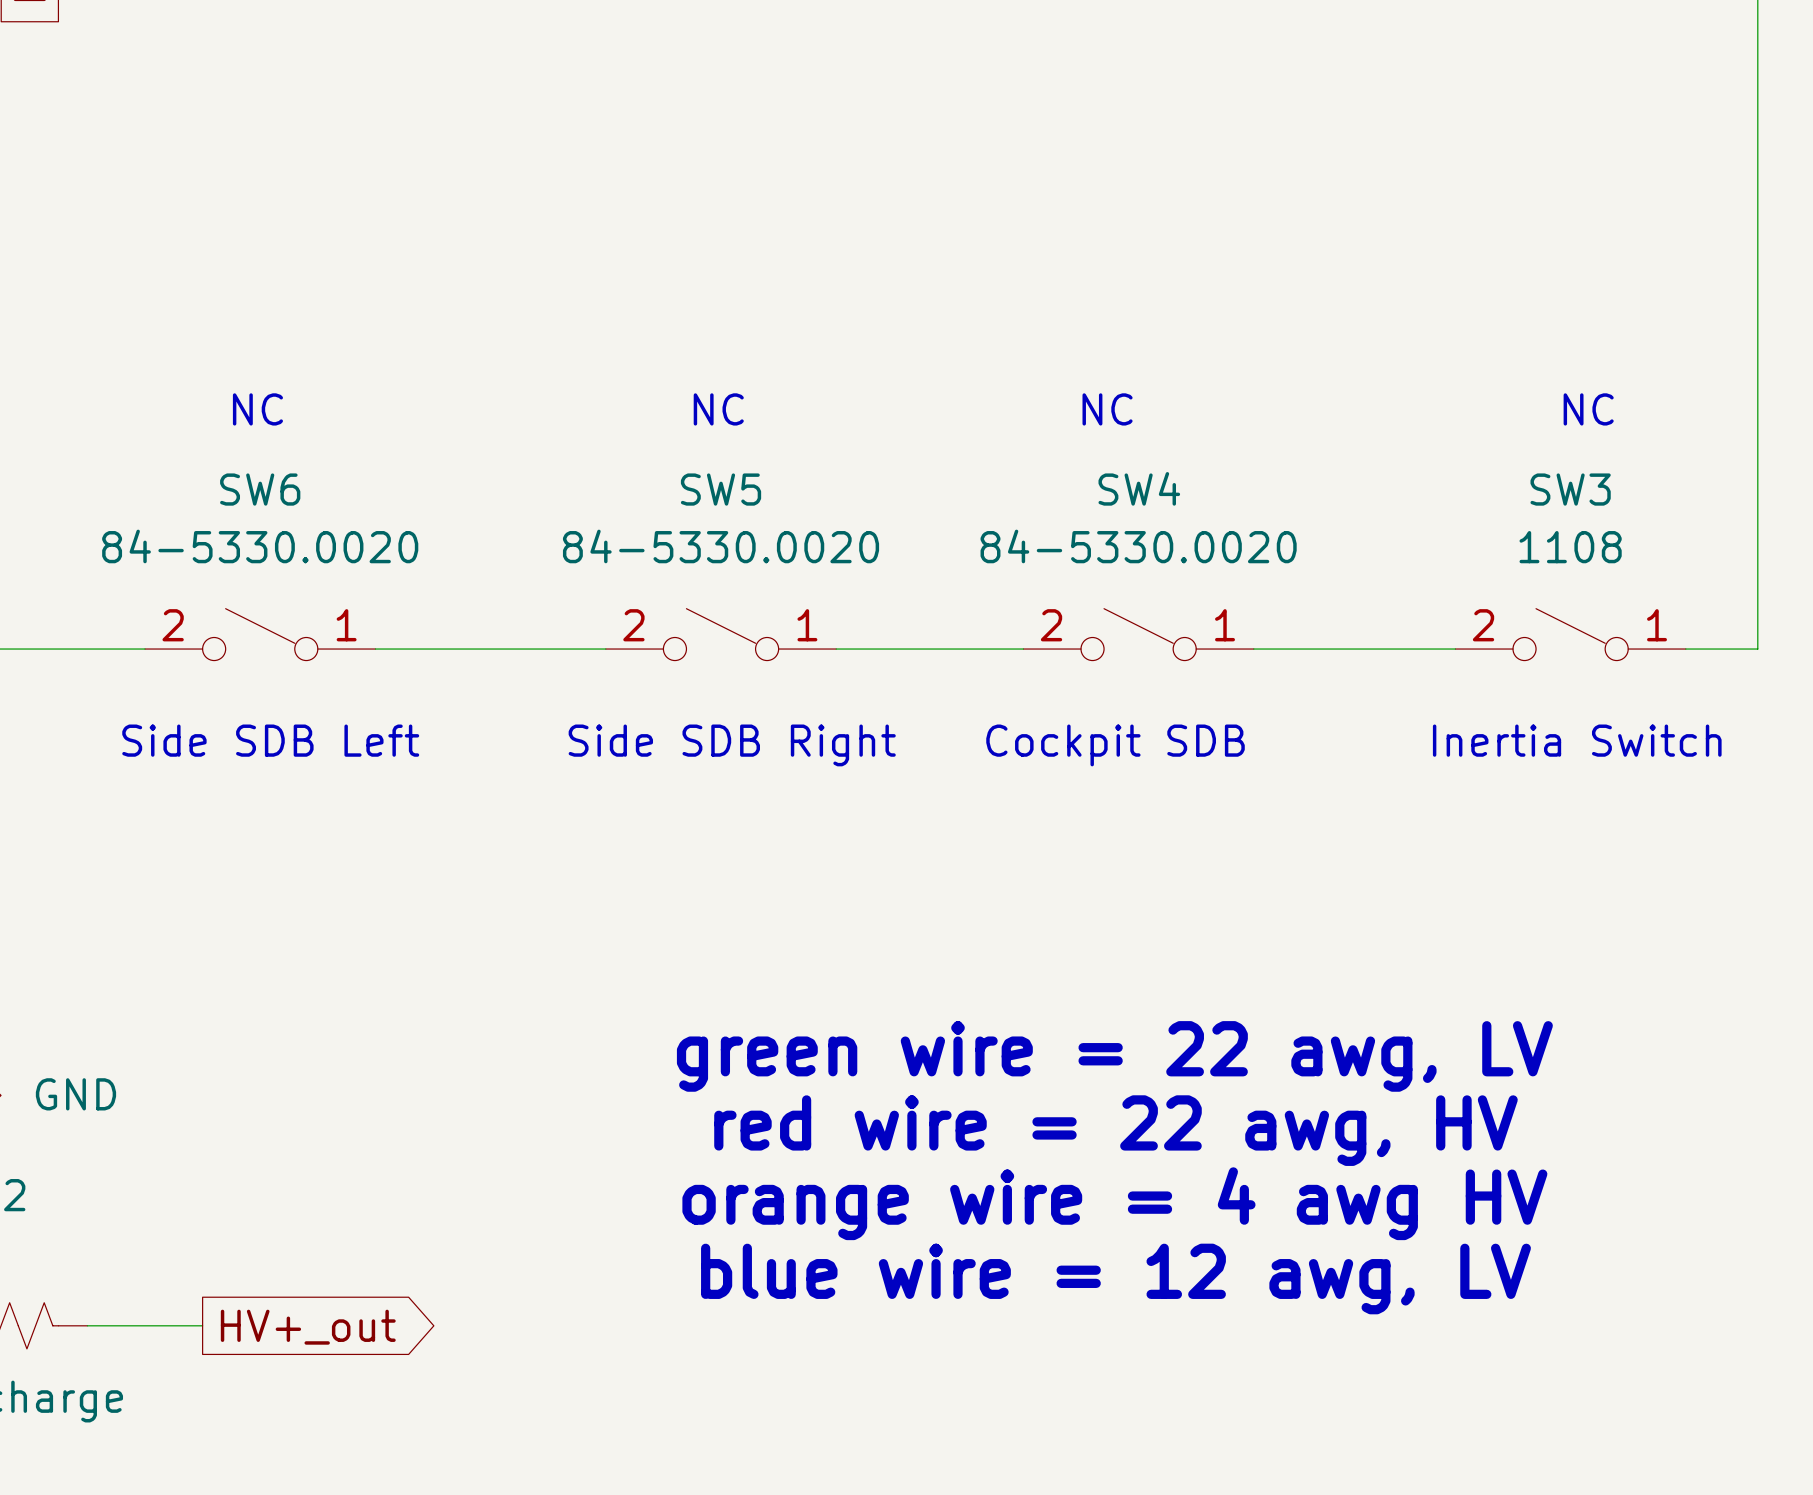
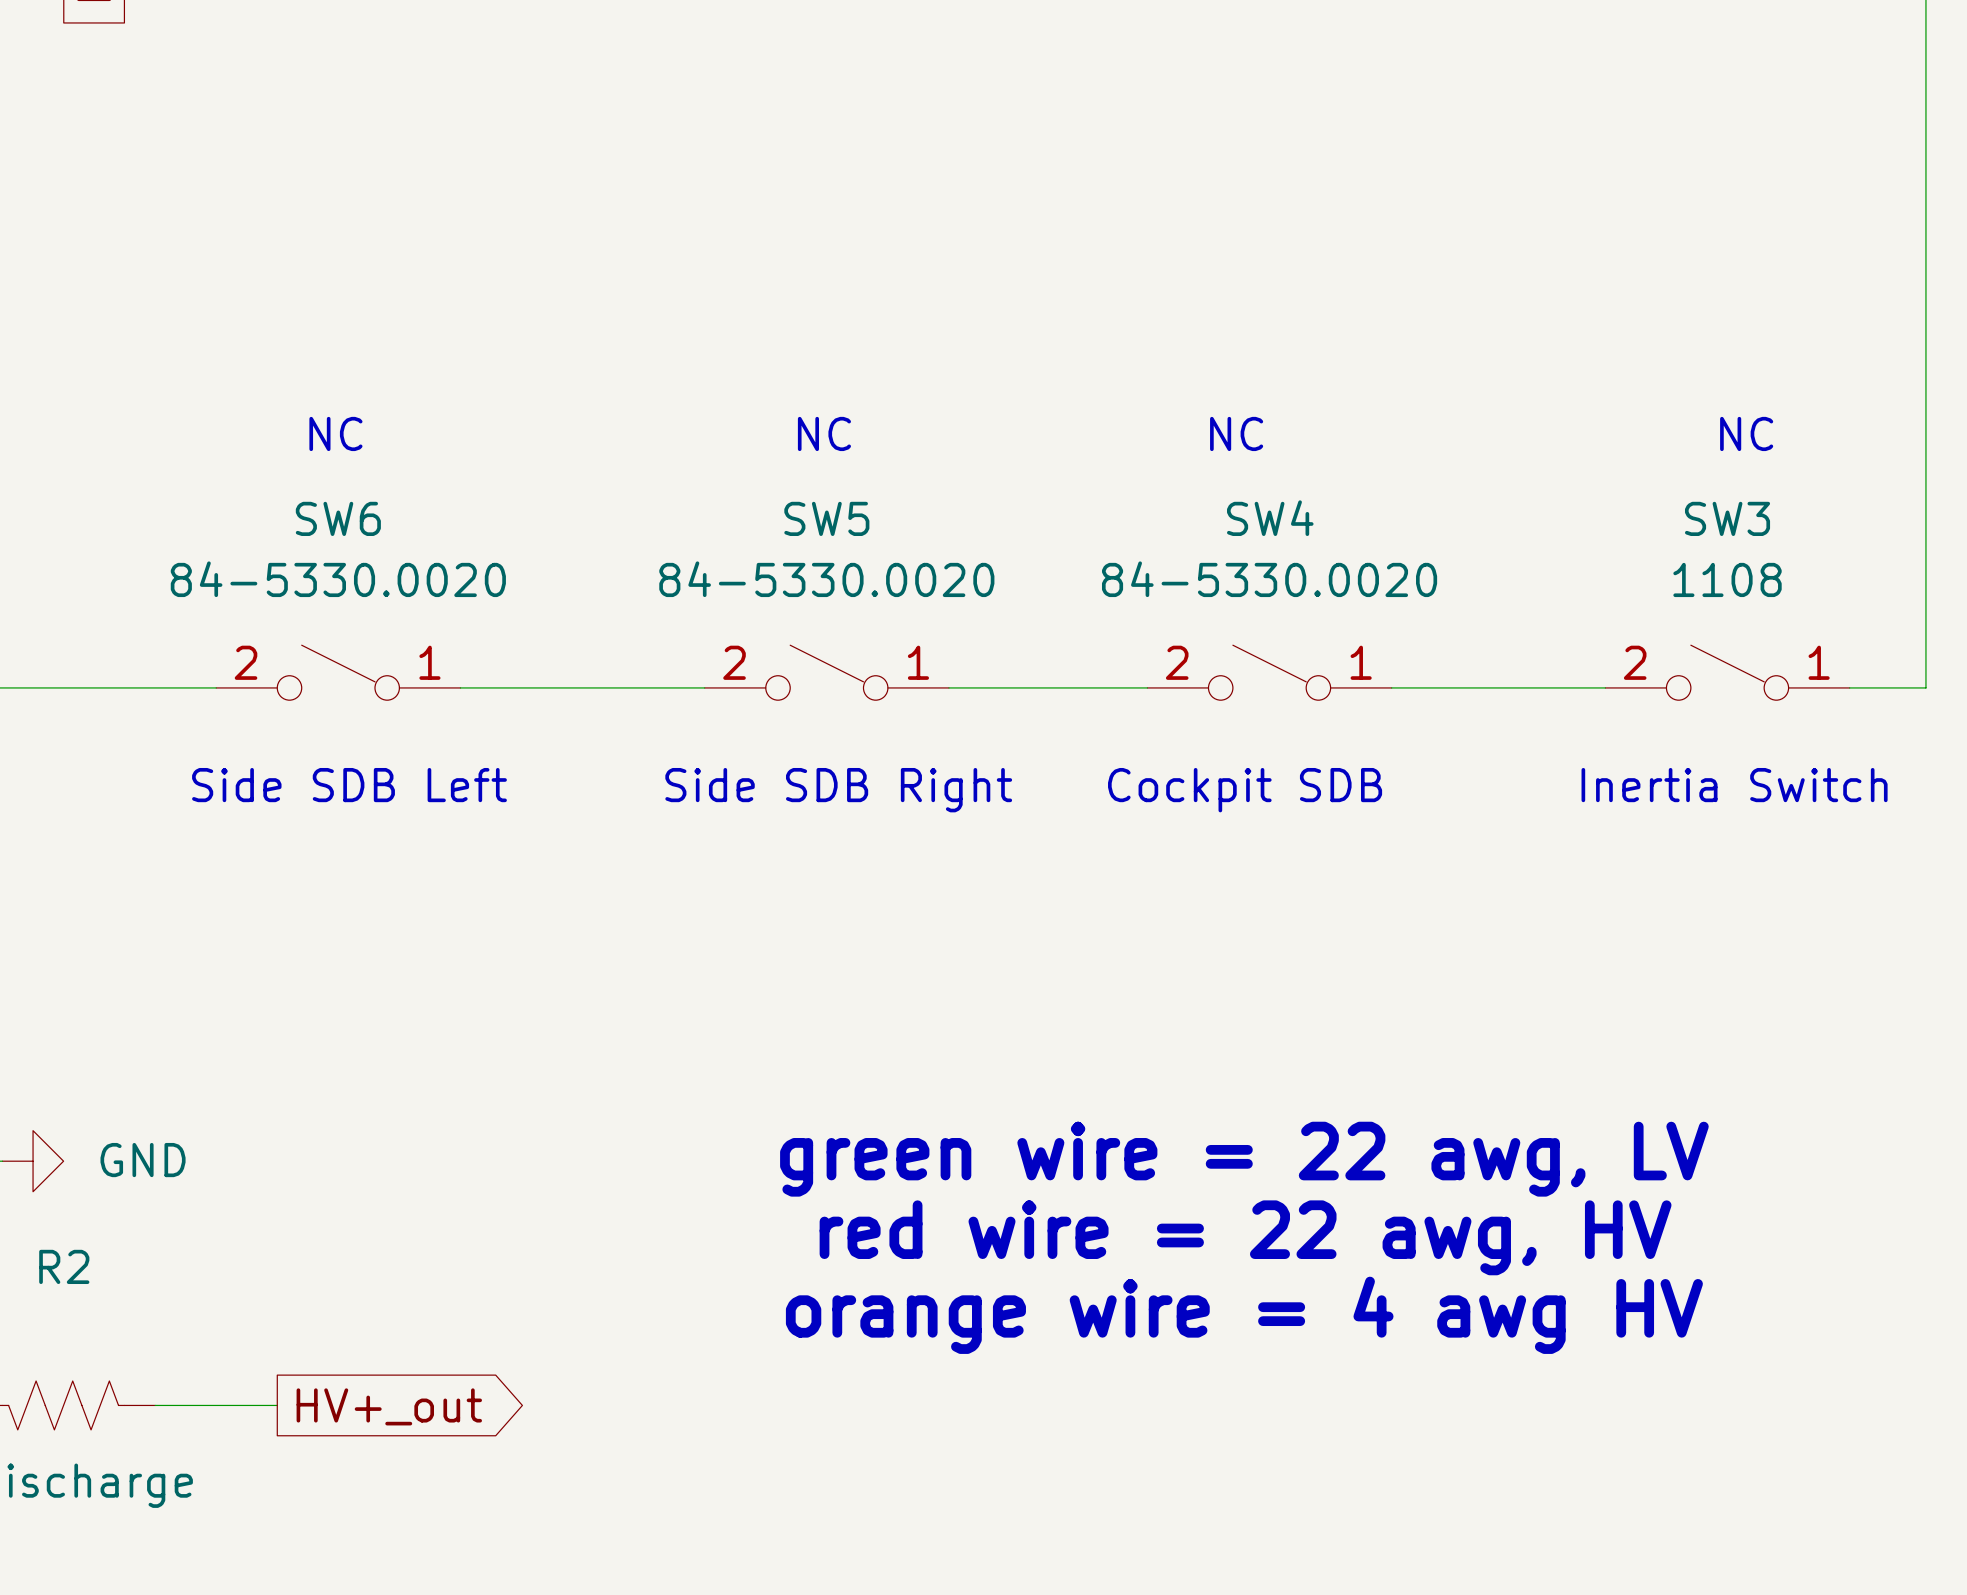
text position: green wire = 22 awg, LV (1114, 1056) -> green wire = 22 awg, LV (1244, 1159)
text position: red wire = 22 awg, HV (1115, 1130) -> red wire = 22 awg, HV (1245, 1237)
text position: orange wire = 4 awg HV (1114, 1203) -> orange wire = 4 awg HV (1244, 1315)
text: blue wire = 12 awg, LV (1115, 1278) -> none

